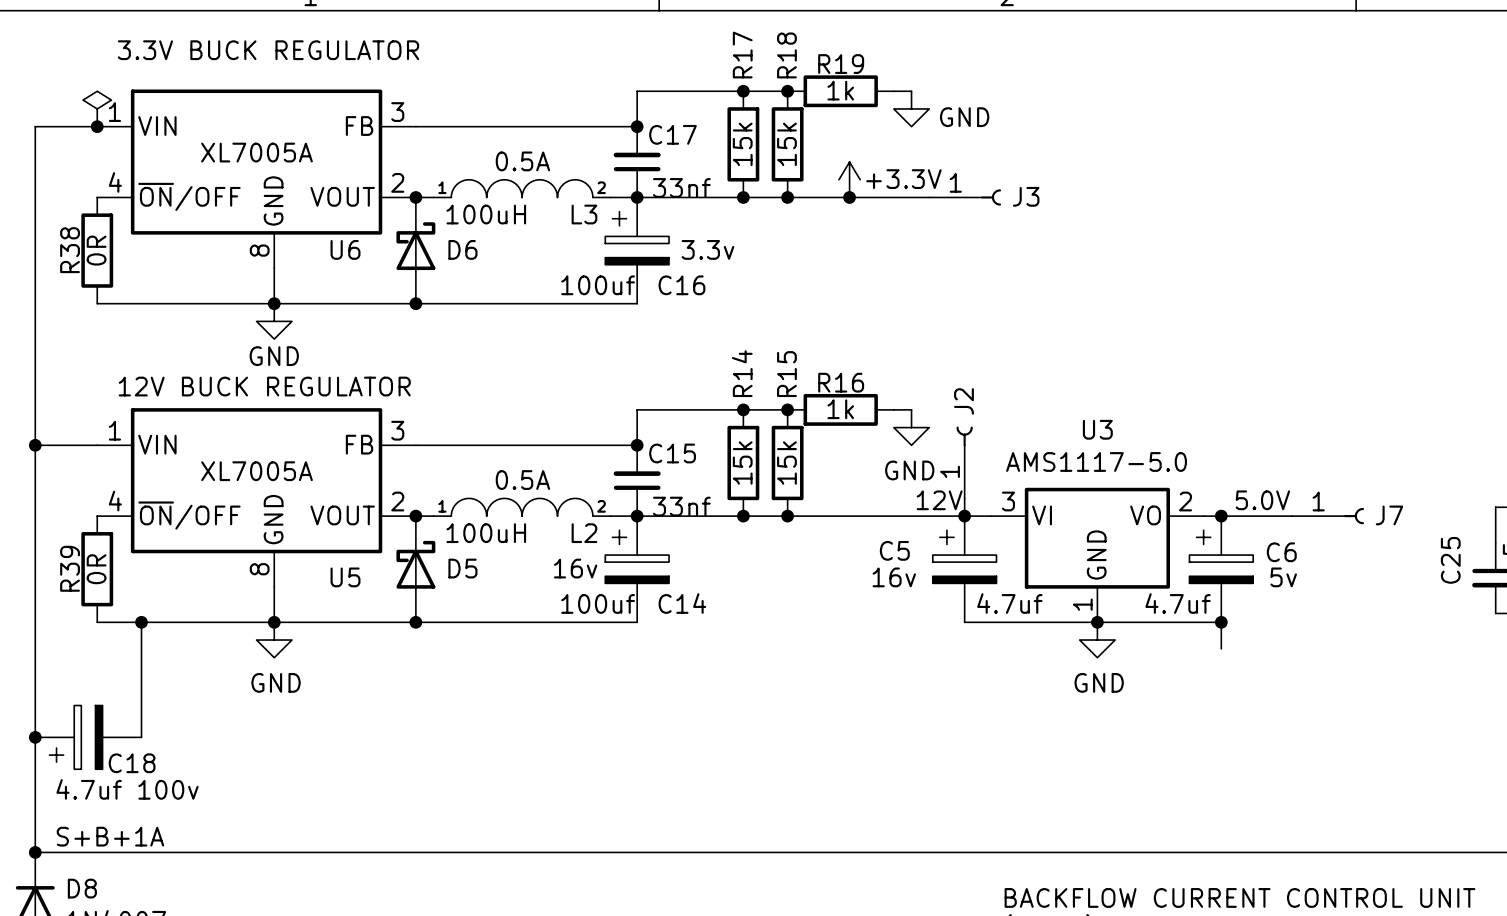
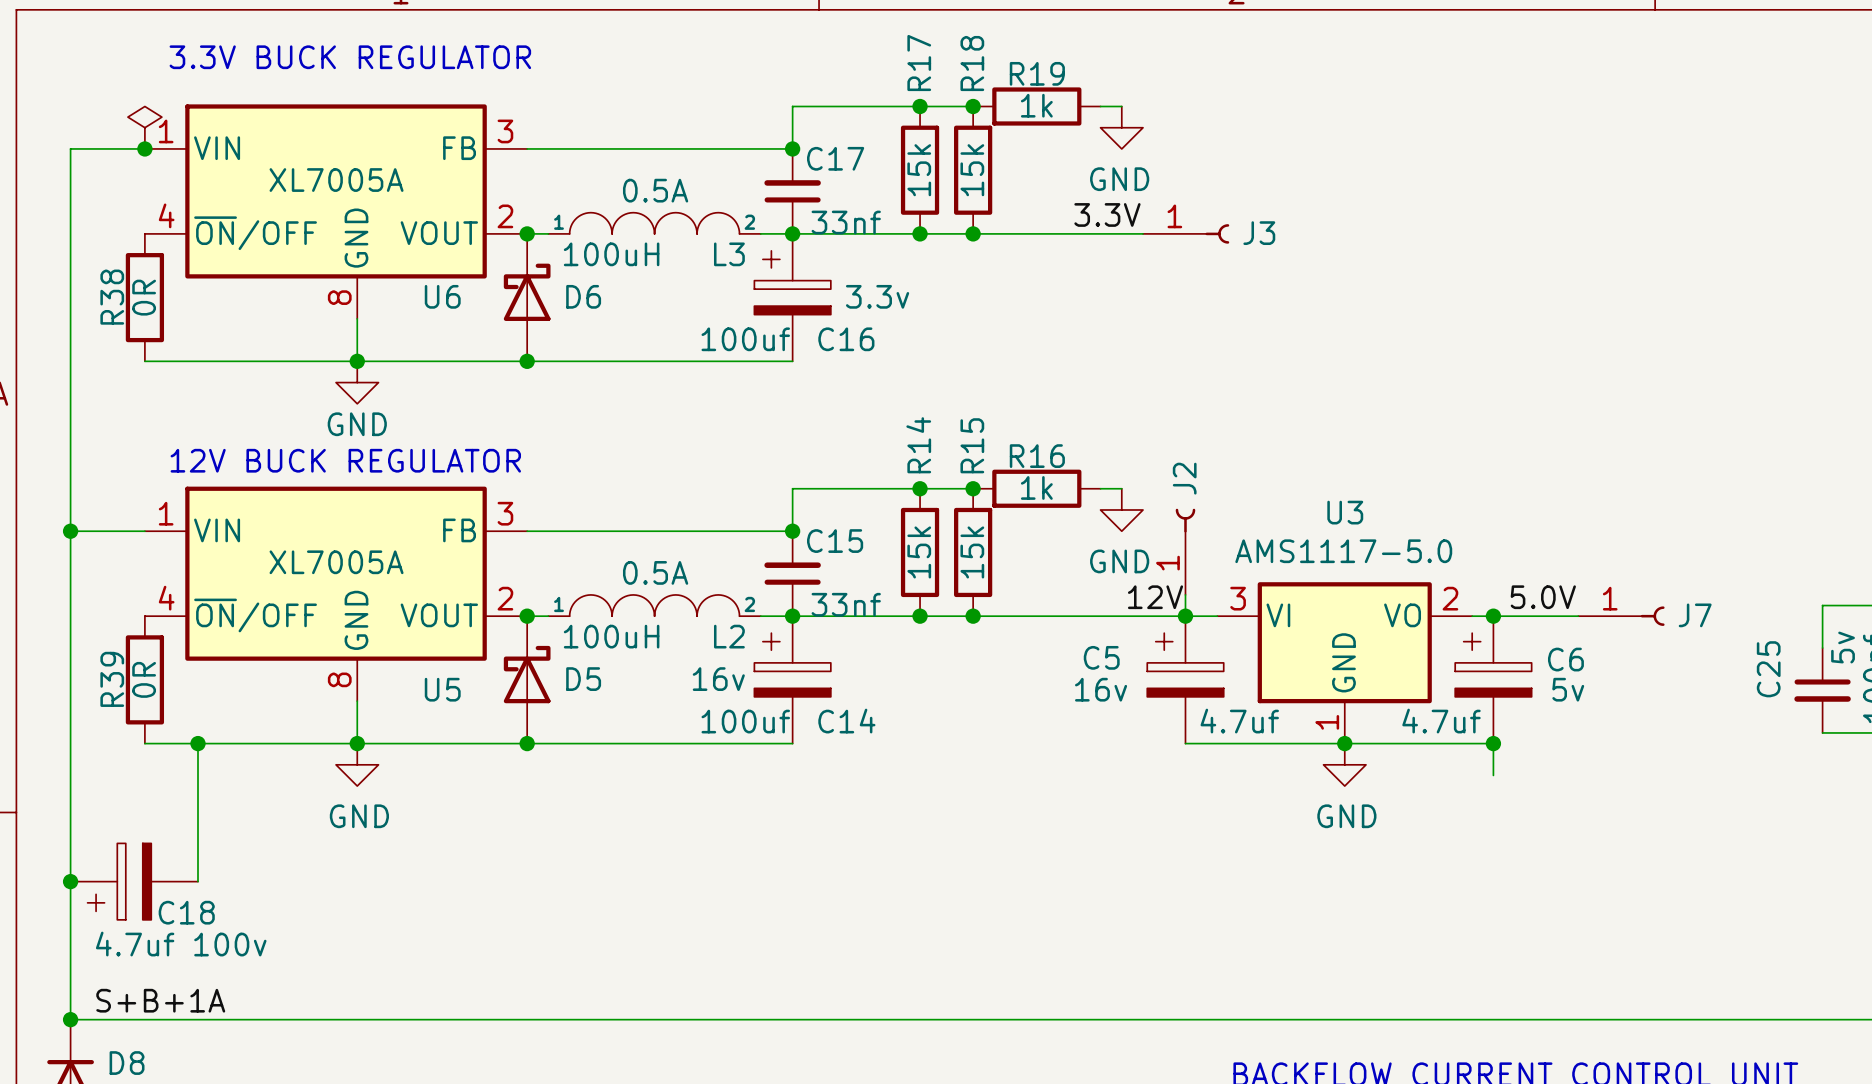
power symbol text position: GND (964, 117) -> GND (1119, 179)
power symbol: +3.3V (849, 179) -> none
label: none -> 3.3V (1107, 214)
junction: (849, 197) -> none

